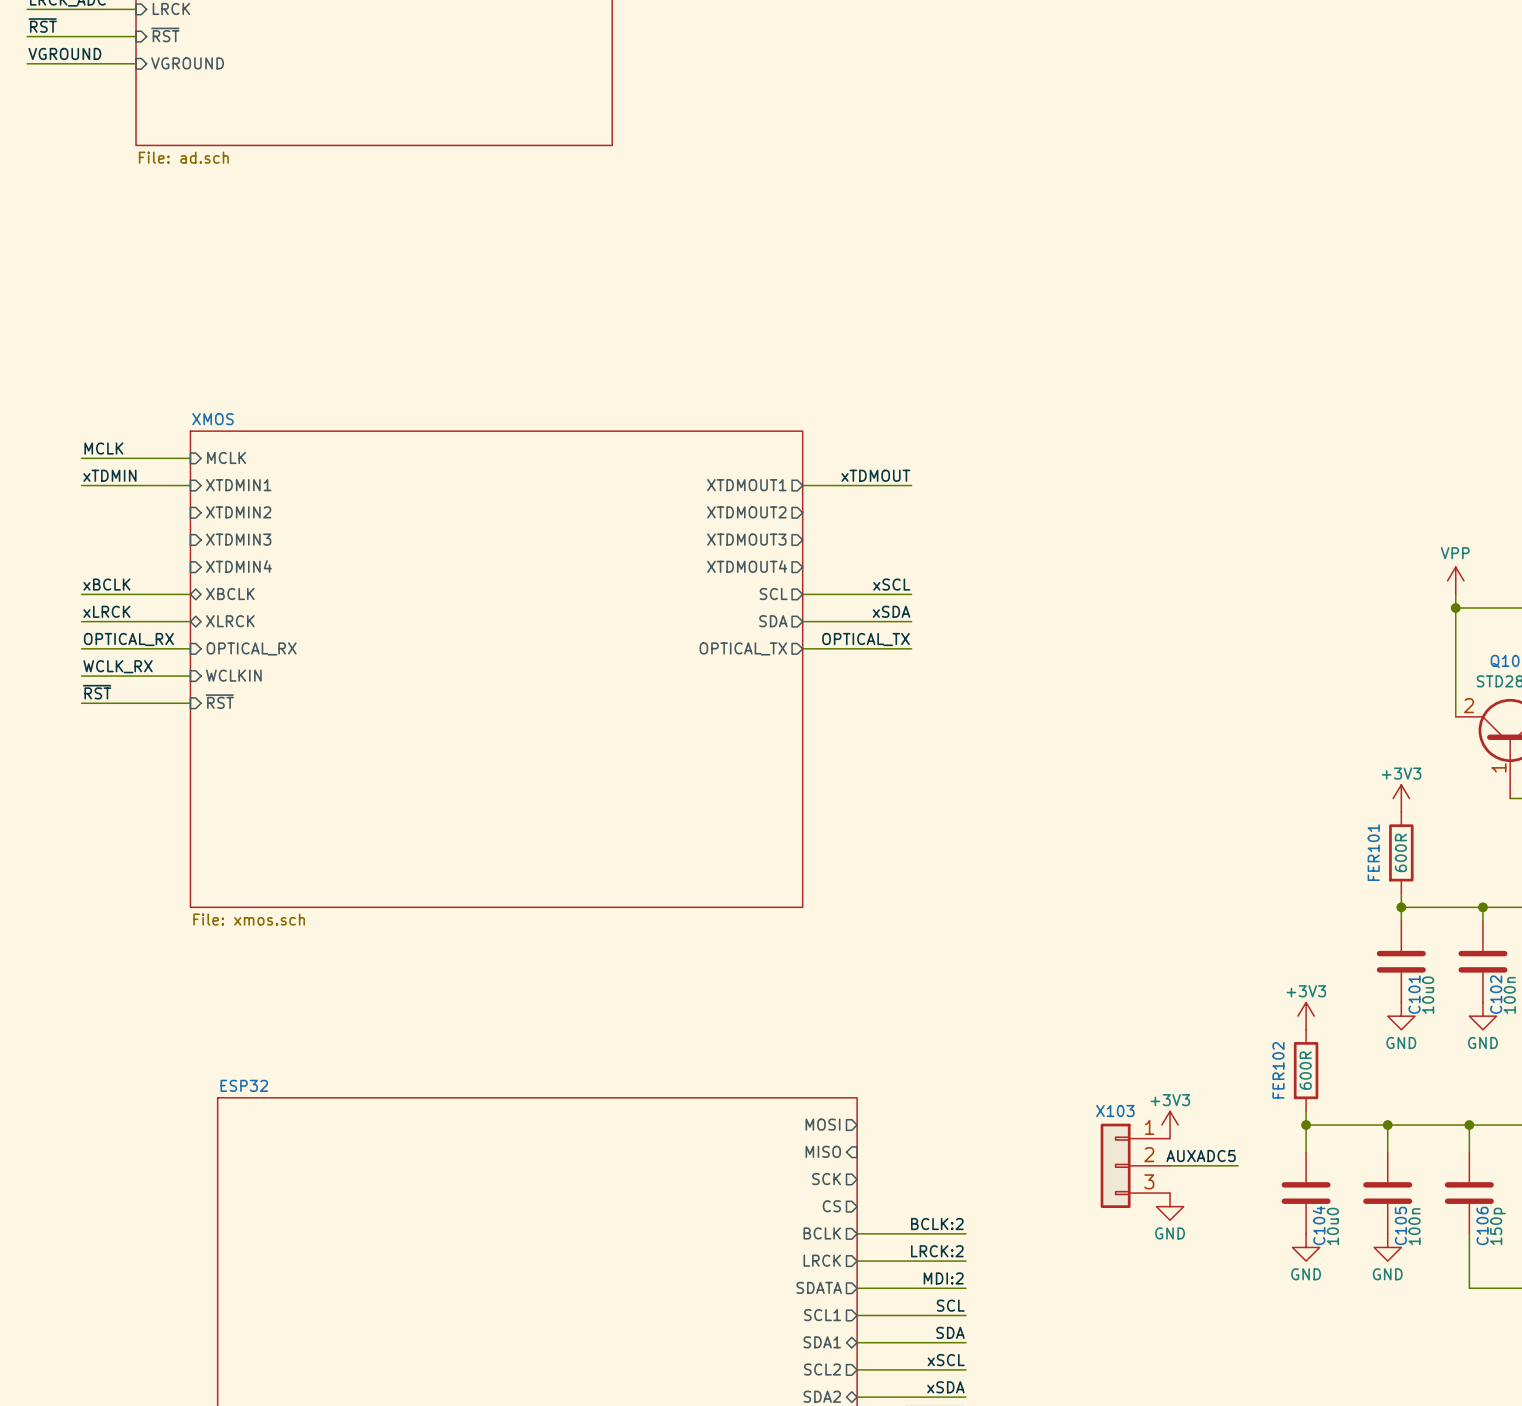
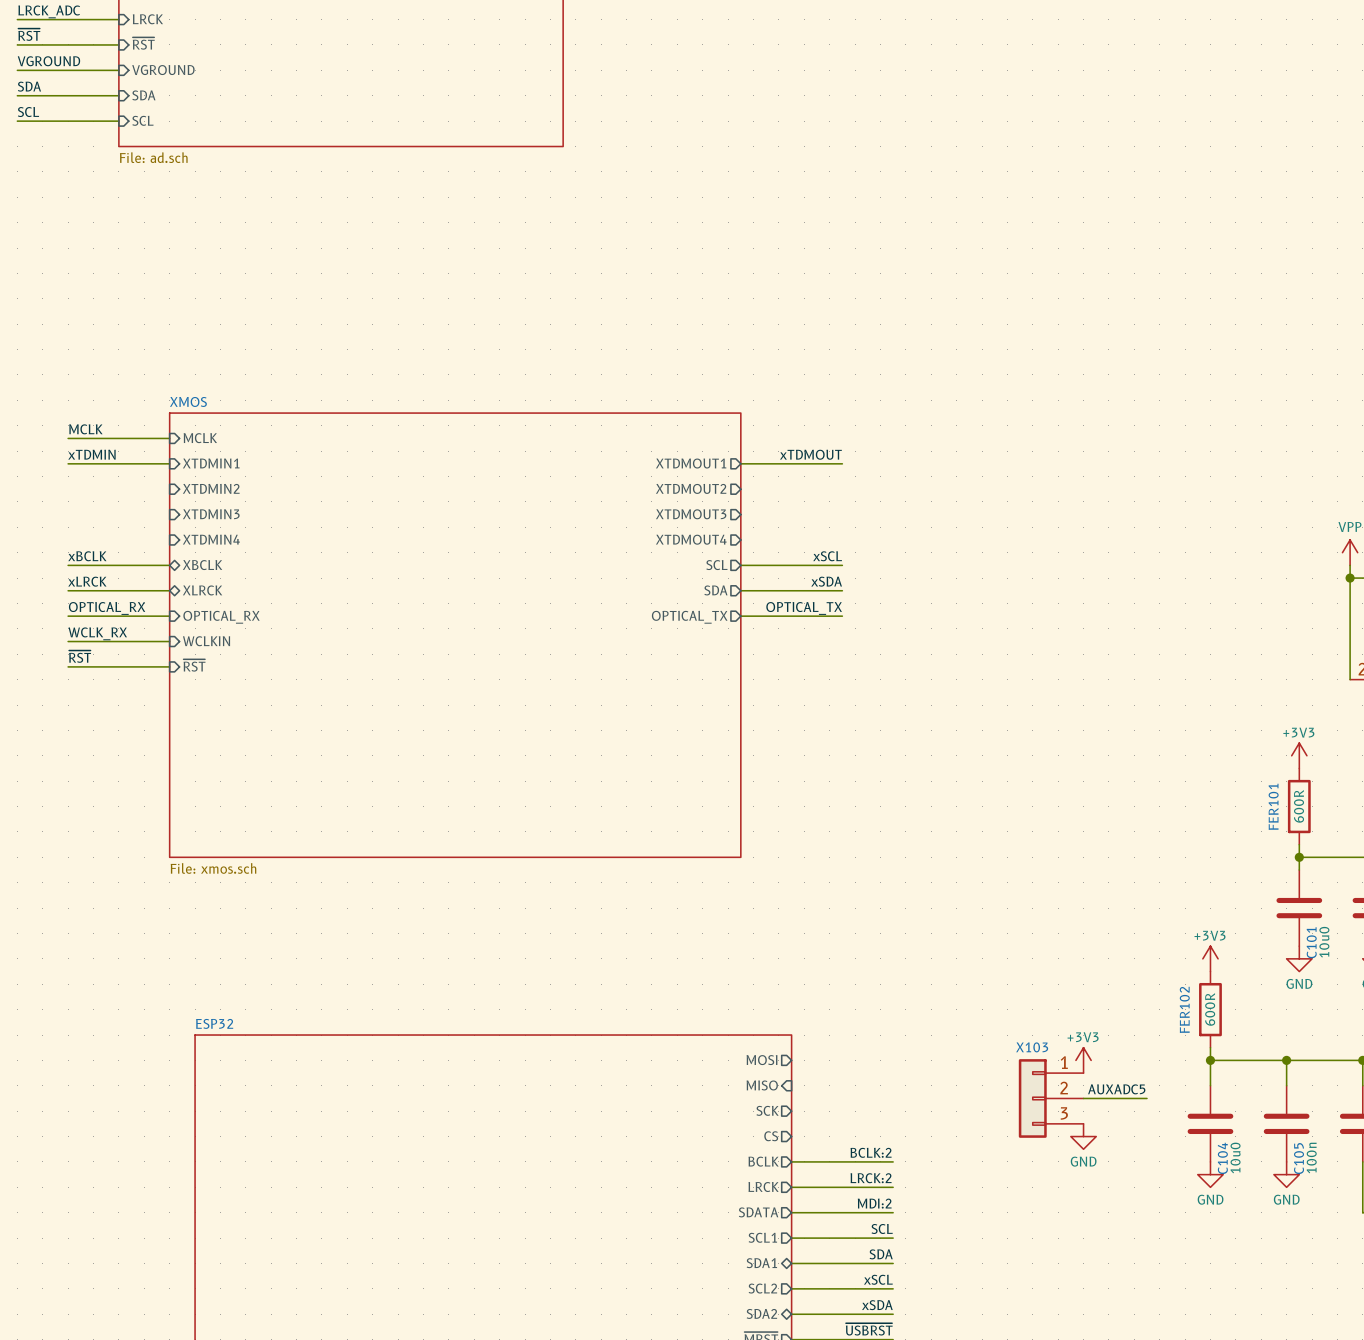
label: none -> SDA (29, 86)
sheet pin: none -> SDA (143, 95)
wire: none -> (17, 95) (118, 95)
label: none -> SCL (28, 112)
sheet pin: none -> SCL (142, 120)
wire: none -> (17, 121) (118, 121)

